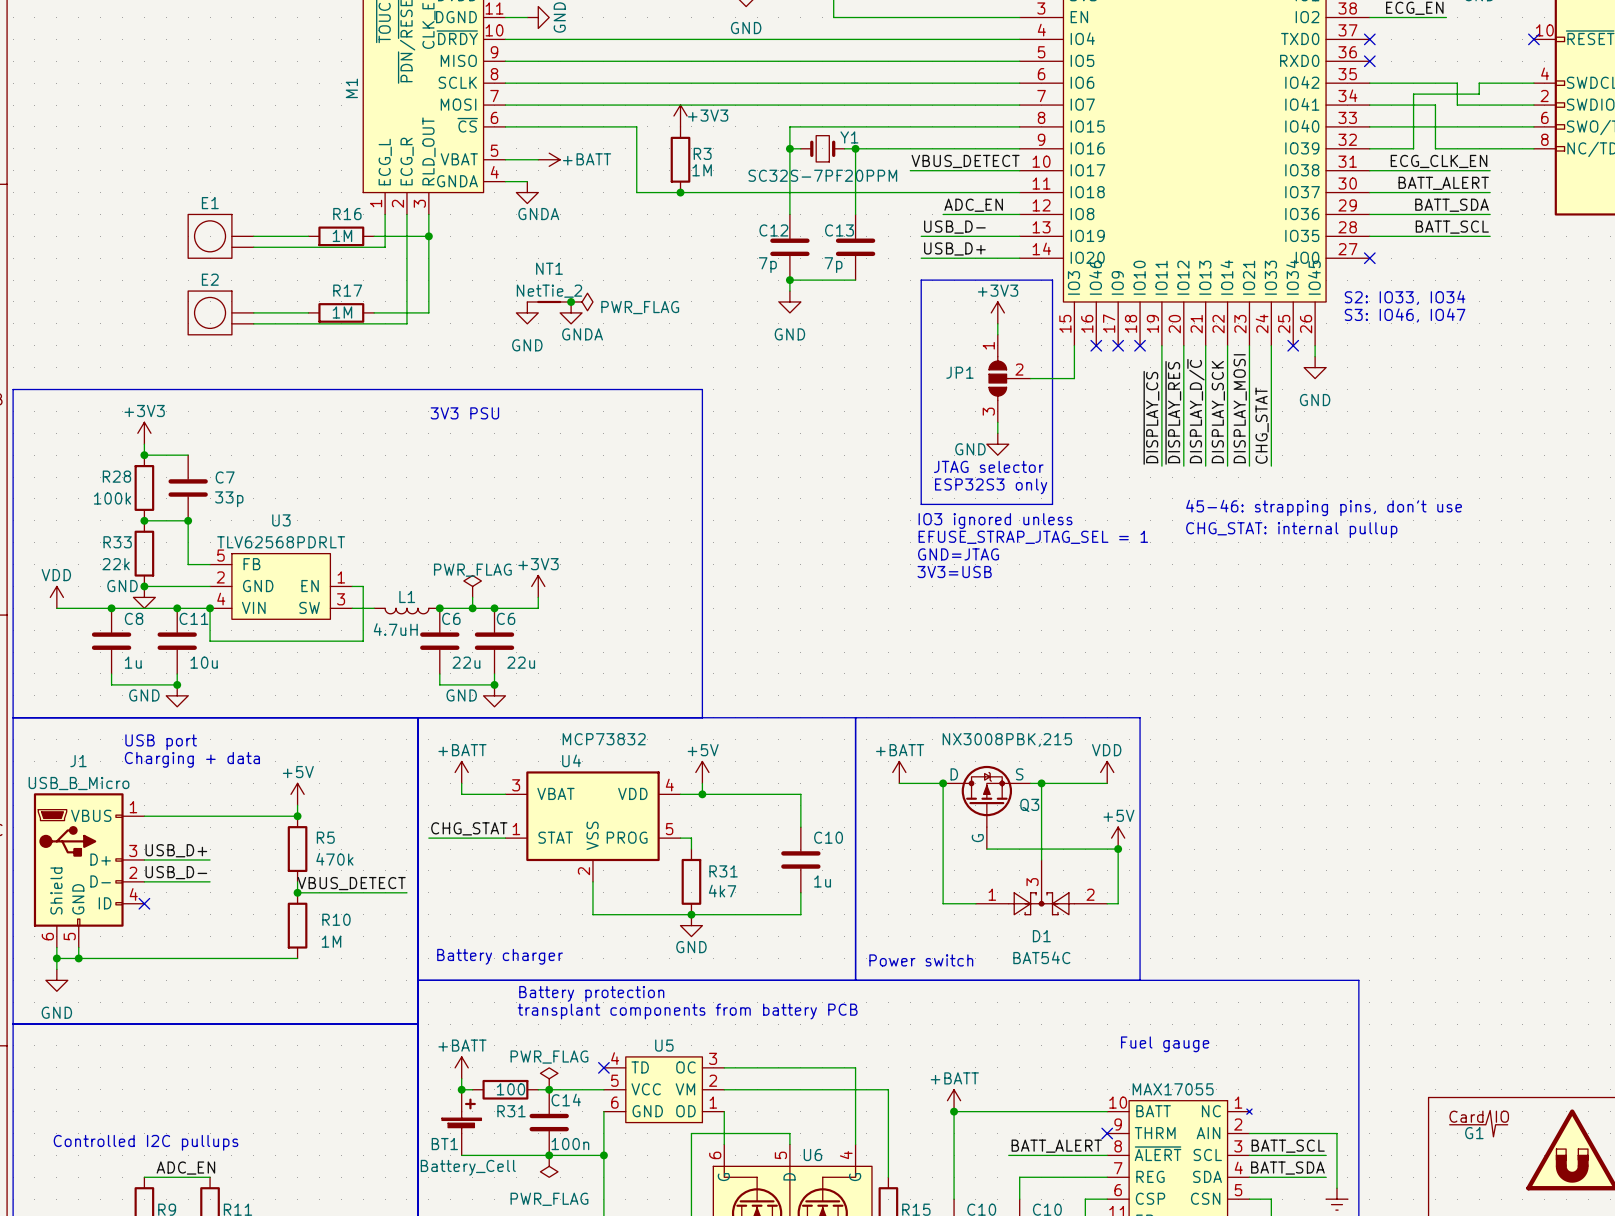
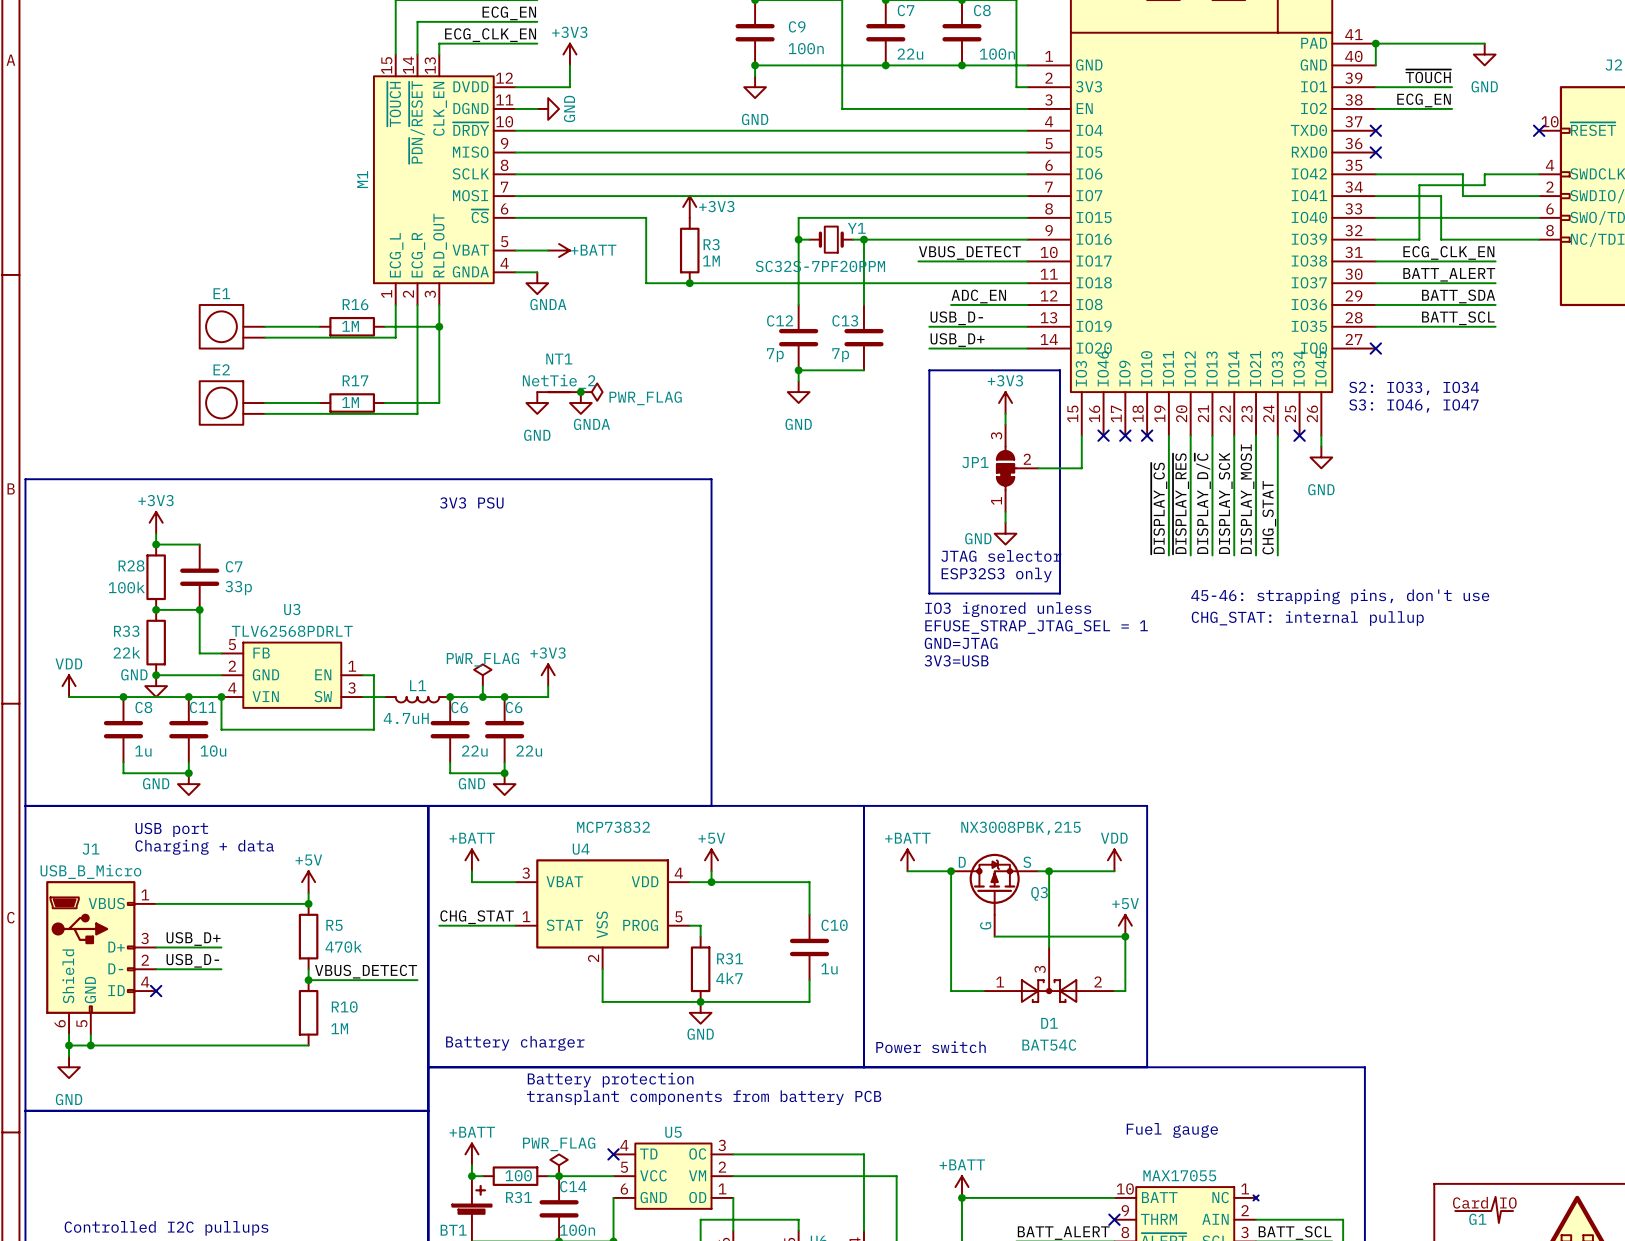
JP1 symbol: [989, 334, 1031, 423] -> [996, 424, 1039, 512]

